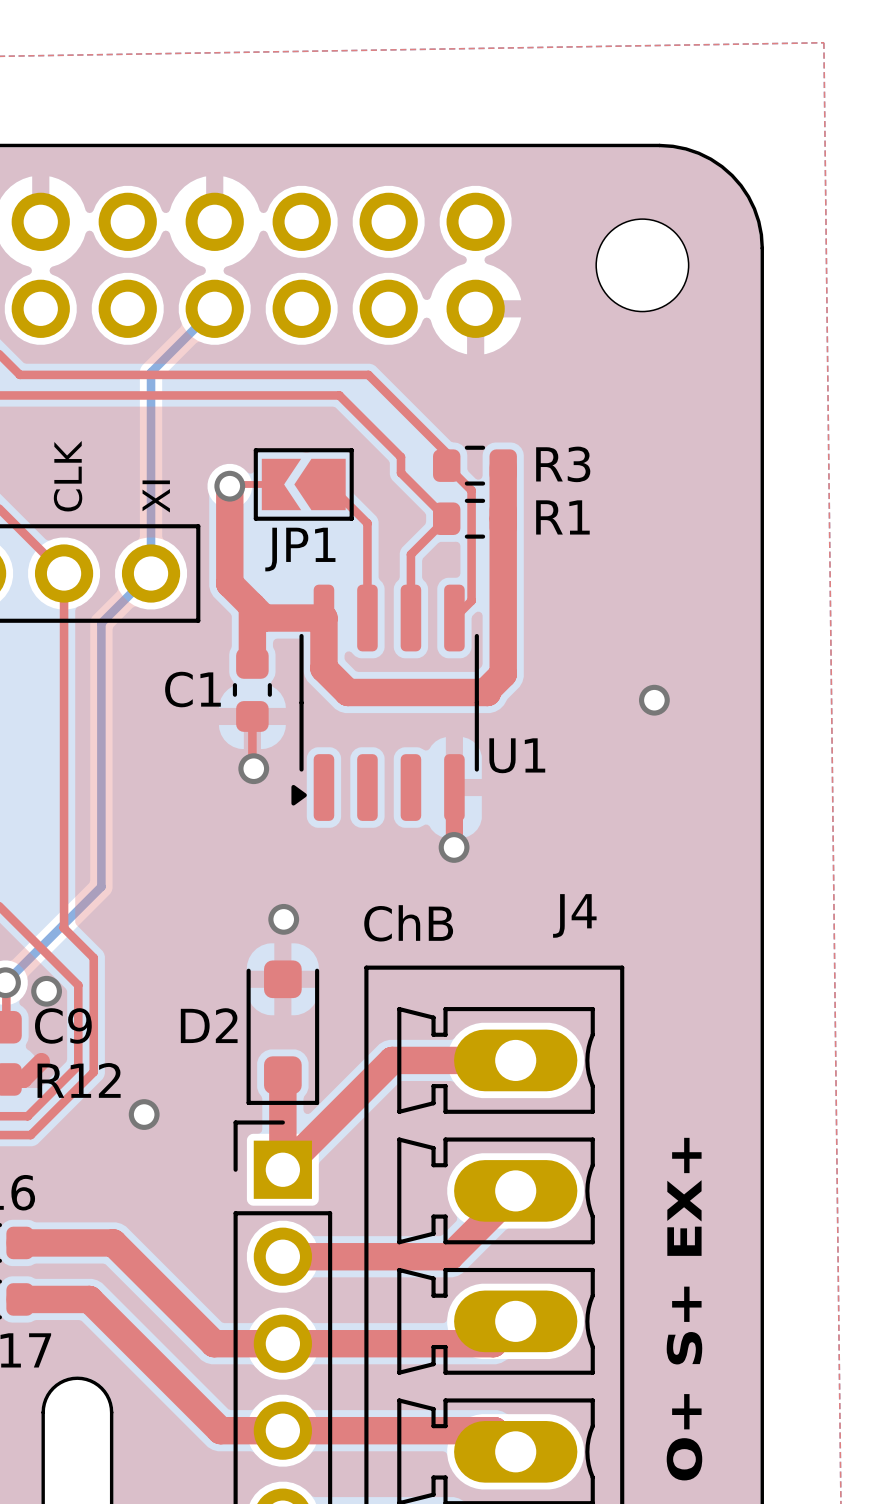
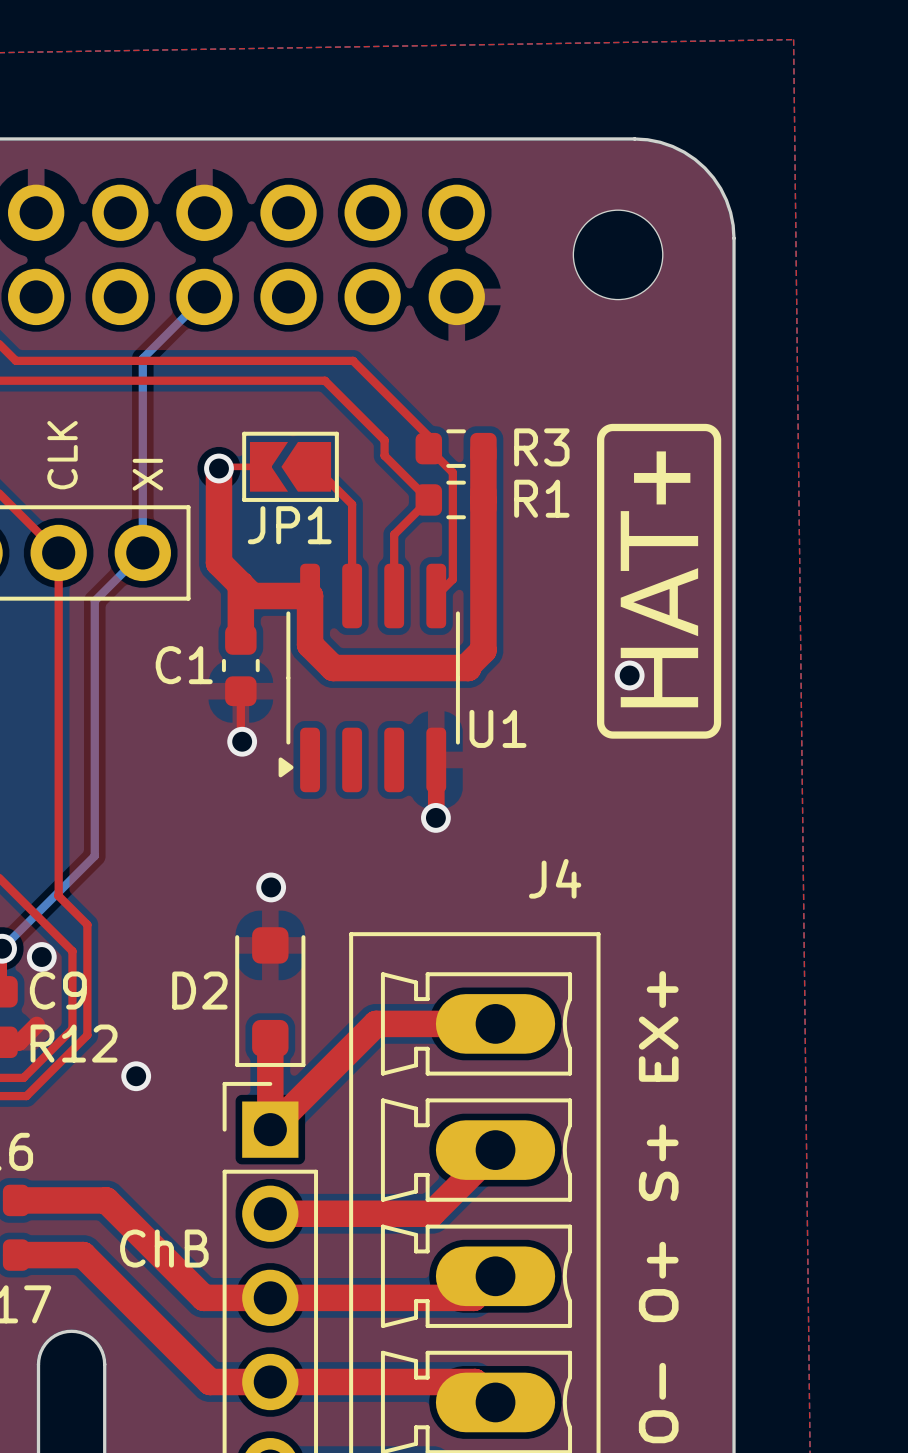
drawing: none -> [597, 423, 722, 739]
text position: ChB (408, 923) -> ChB (164, 1248)

